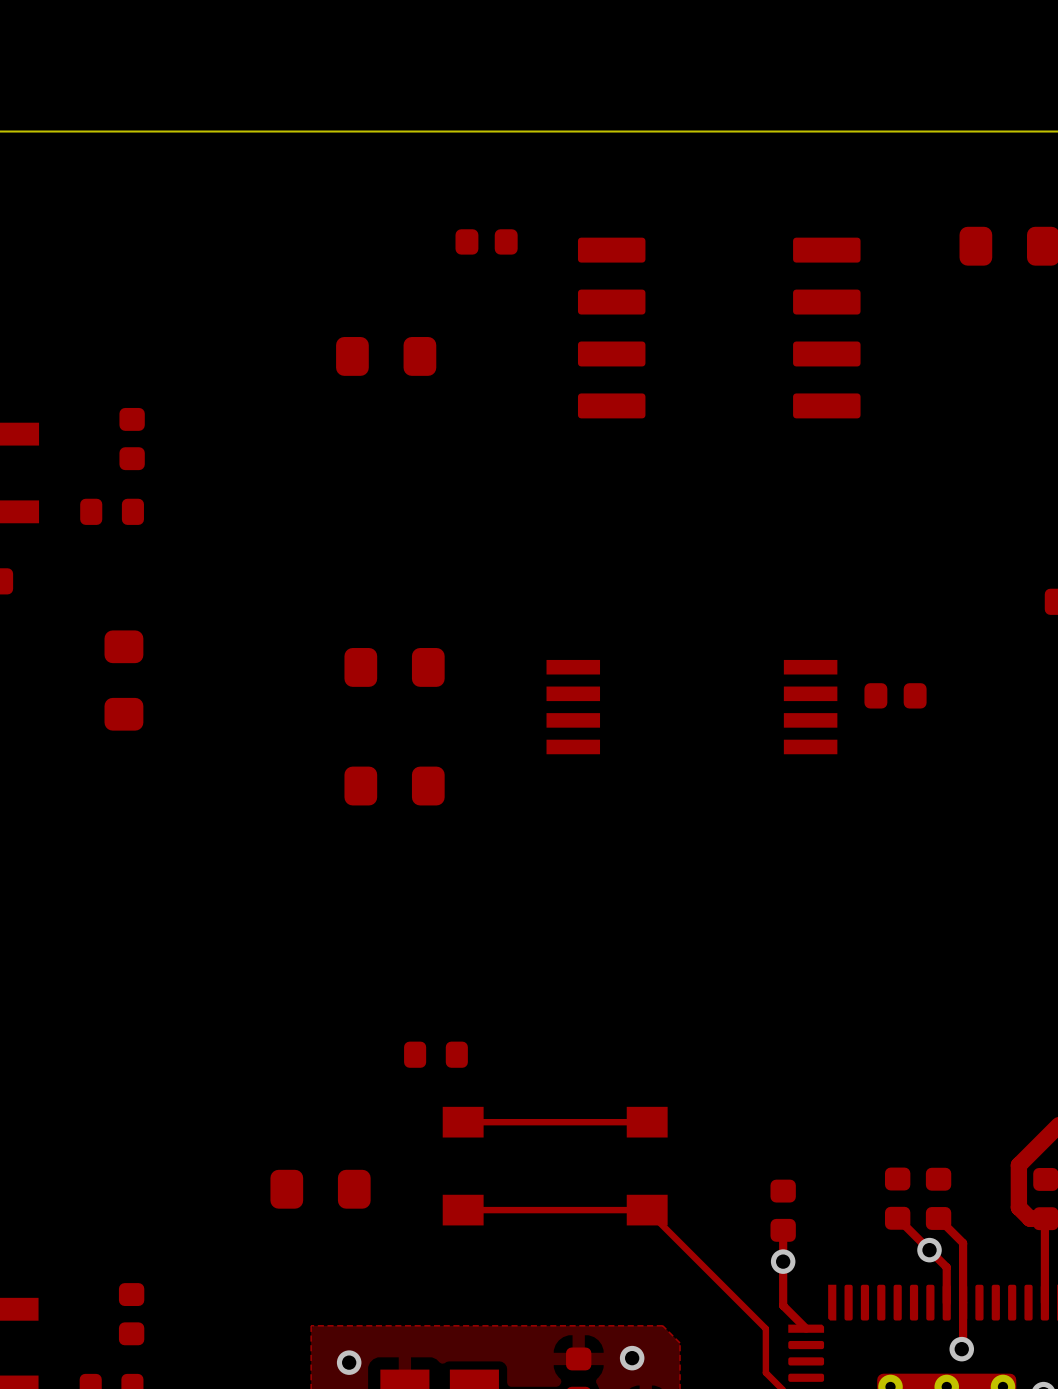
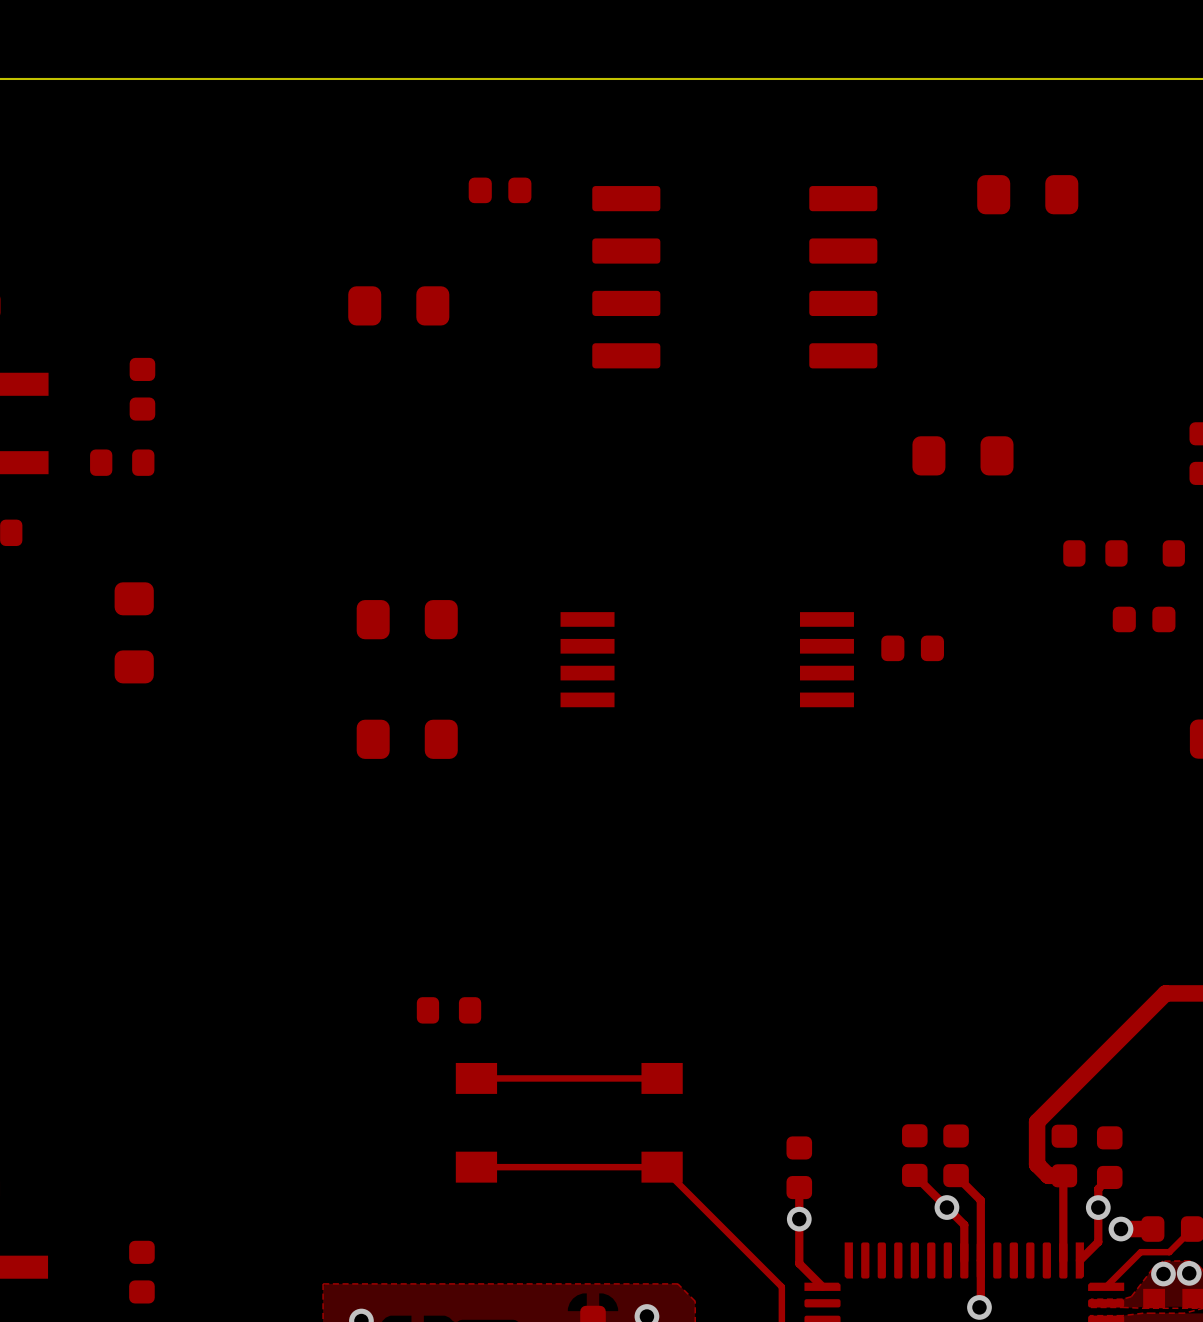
part position: (320, 1189) -> (962, 455)

